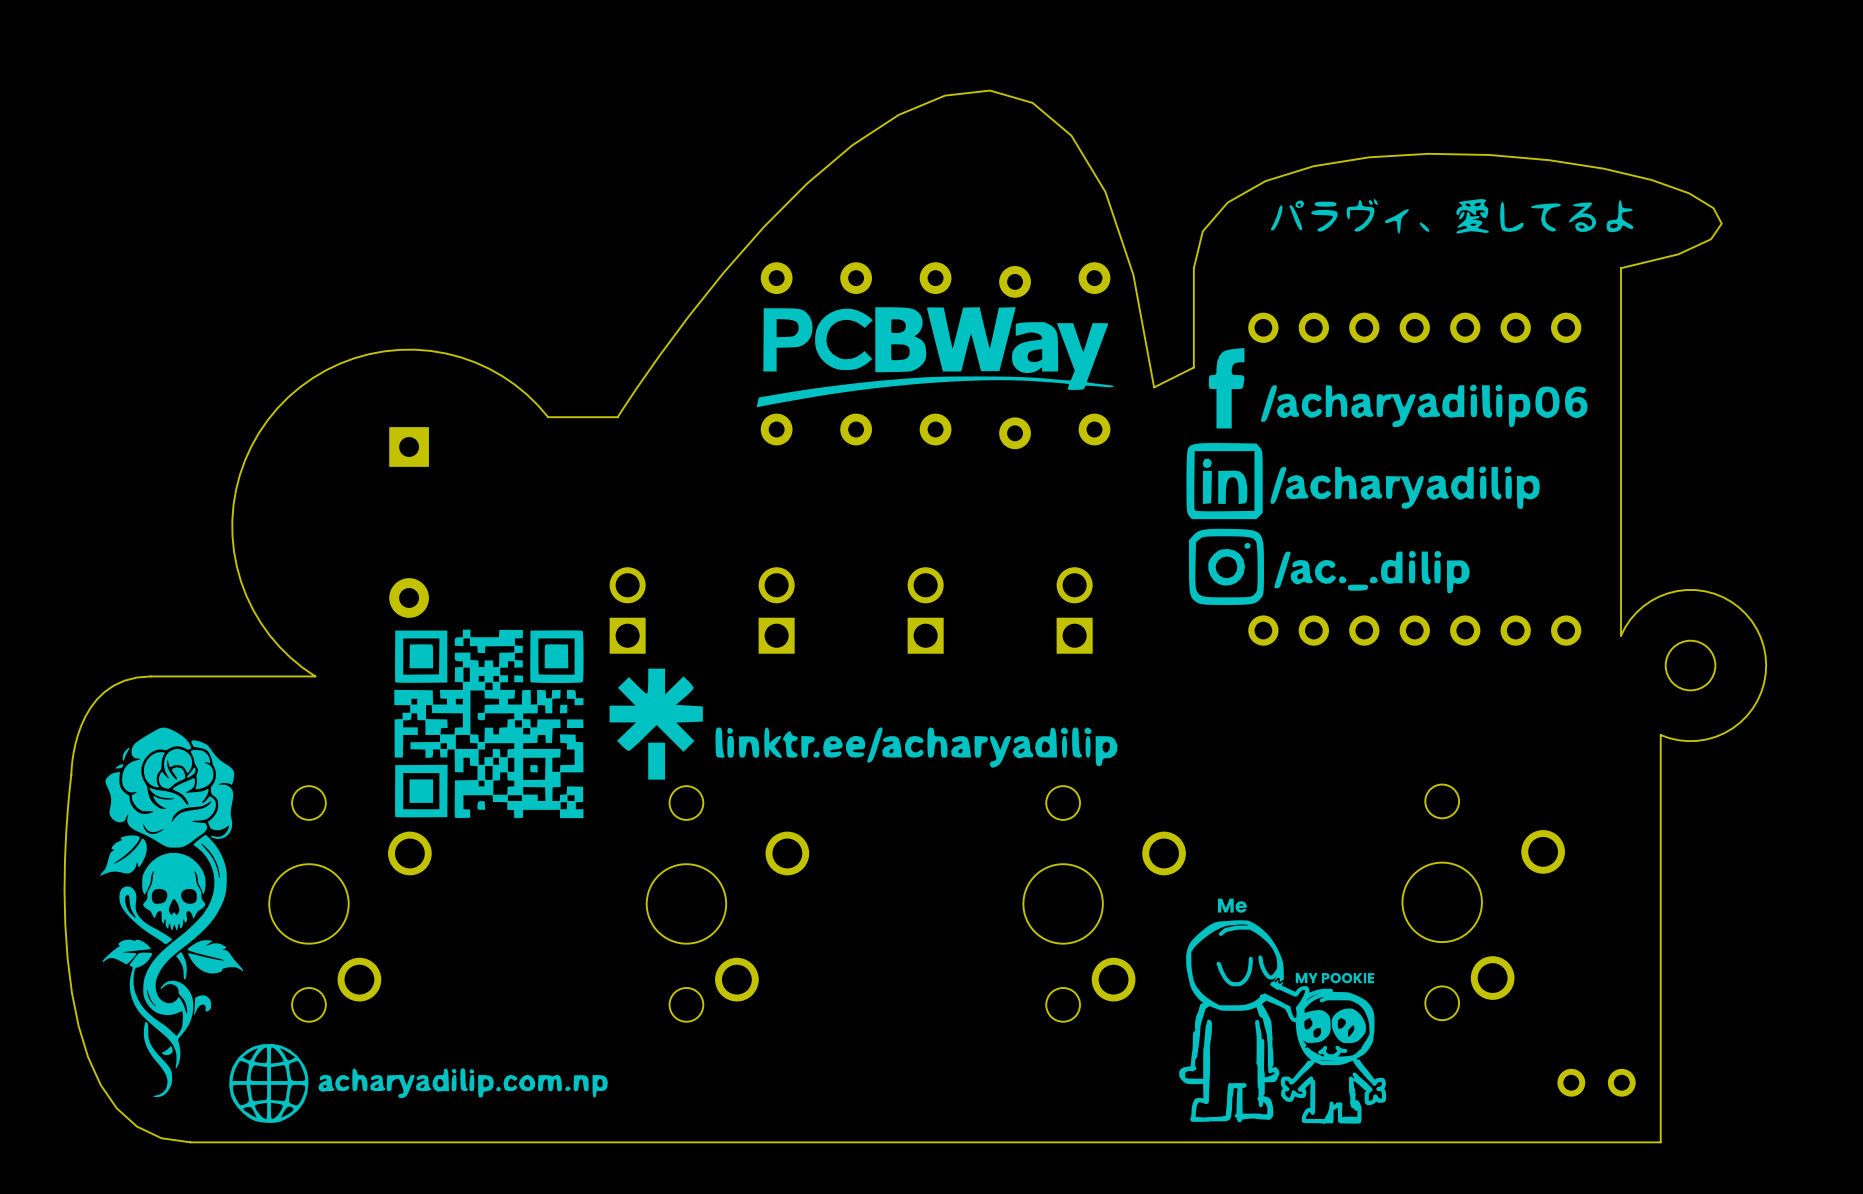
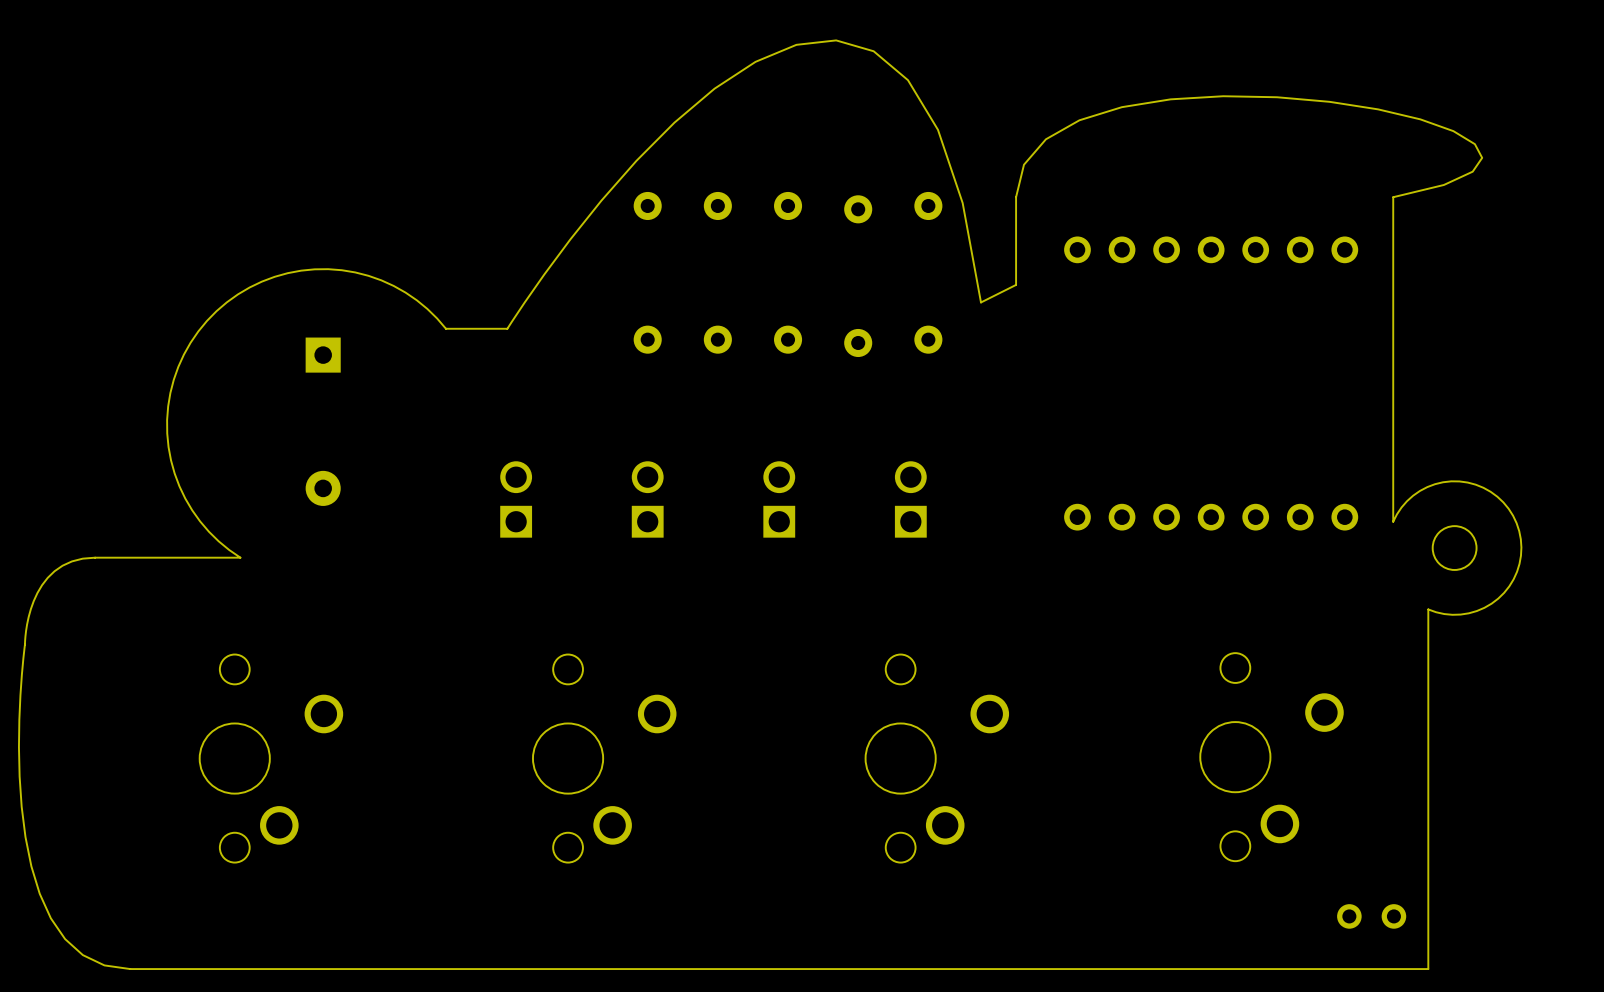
drawing: [1270, 199, 1634, 234] -> none
drawing: [756, 307, 1114, 408] -> none
drawing: [1186, 348, 1588, 605] -> none
drawing: [394, 629, 584, 819] -> none
drawing: [609, 668, 1118, 780] -> none
drawing: [100, 727, 608, 1123] -> none
drawing: [1179, 898, 1387, 1124] -> none

